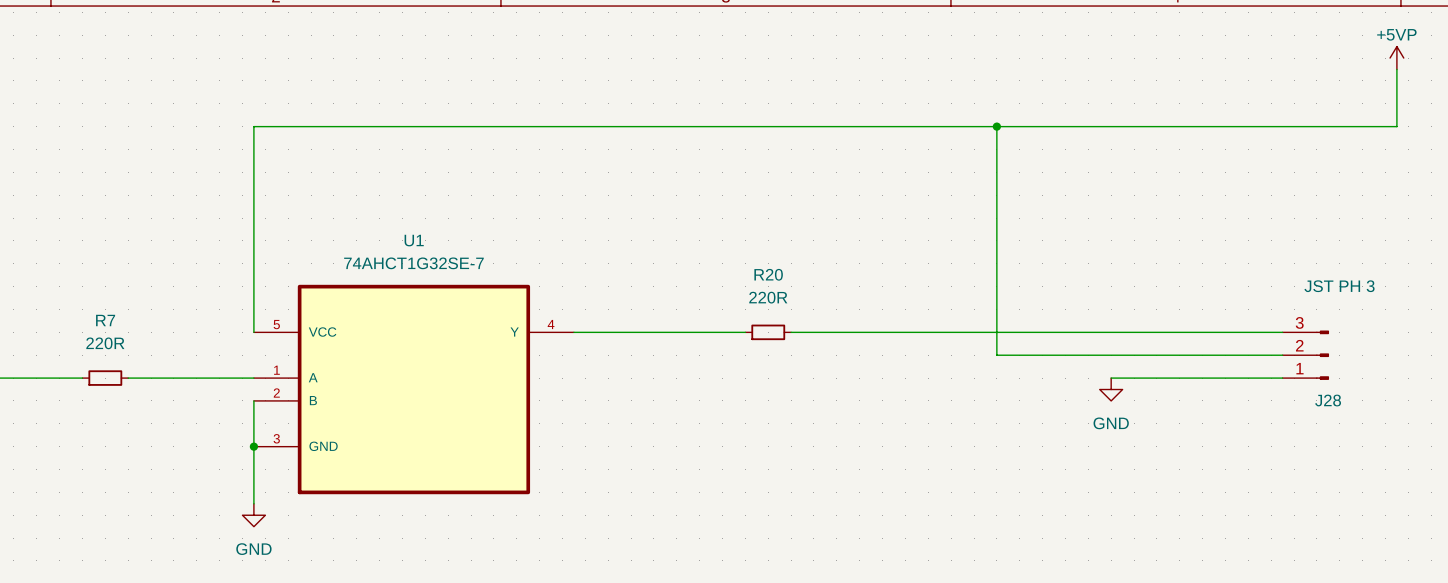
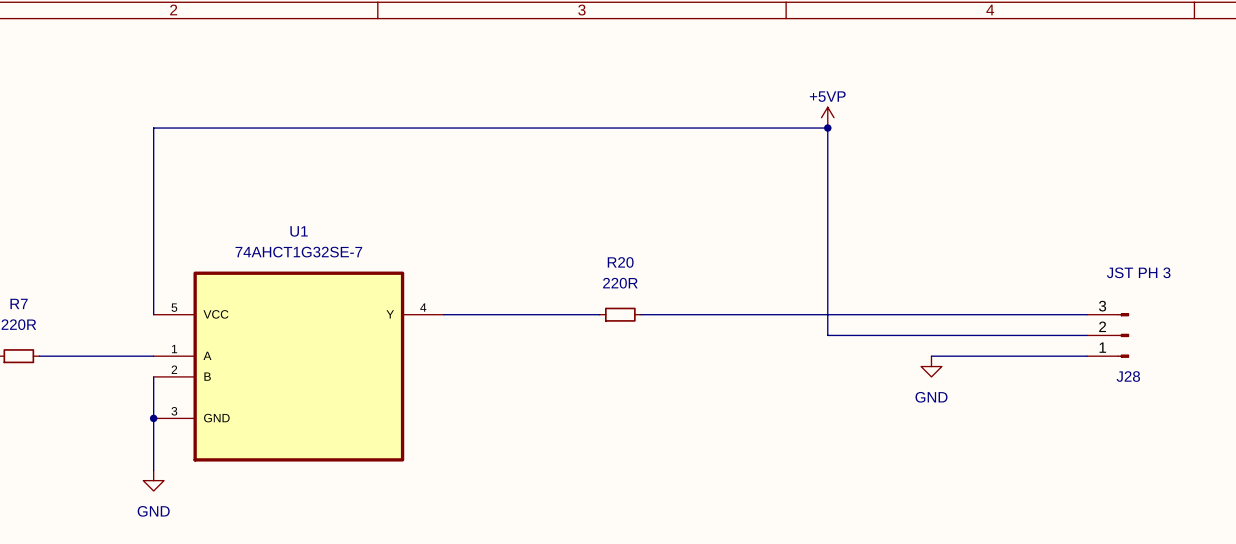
power symbol: +5VP (1396, 58) -> none
wire: (1396, 69) (1396, 126) (996, 126) -> none
power symbol: none -> +5VP (827, 117)

